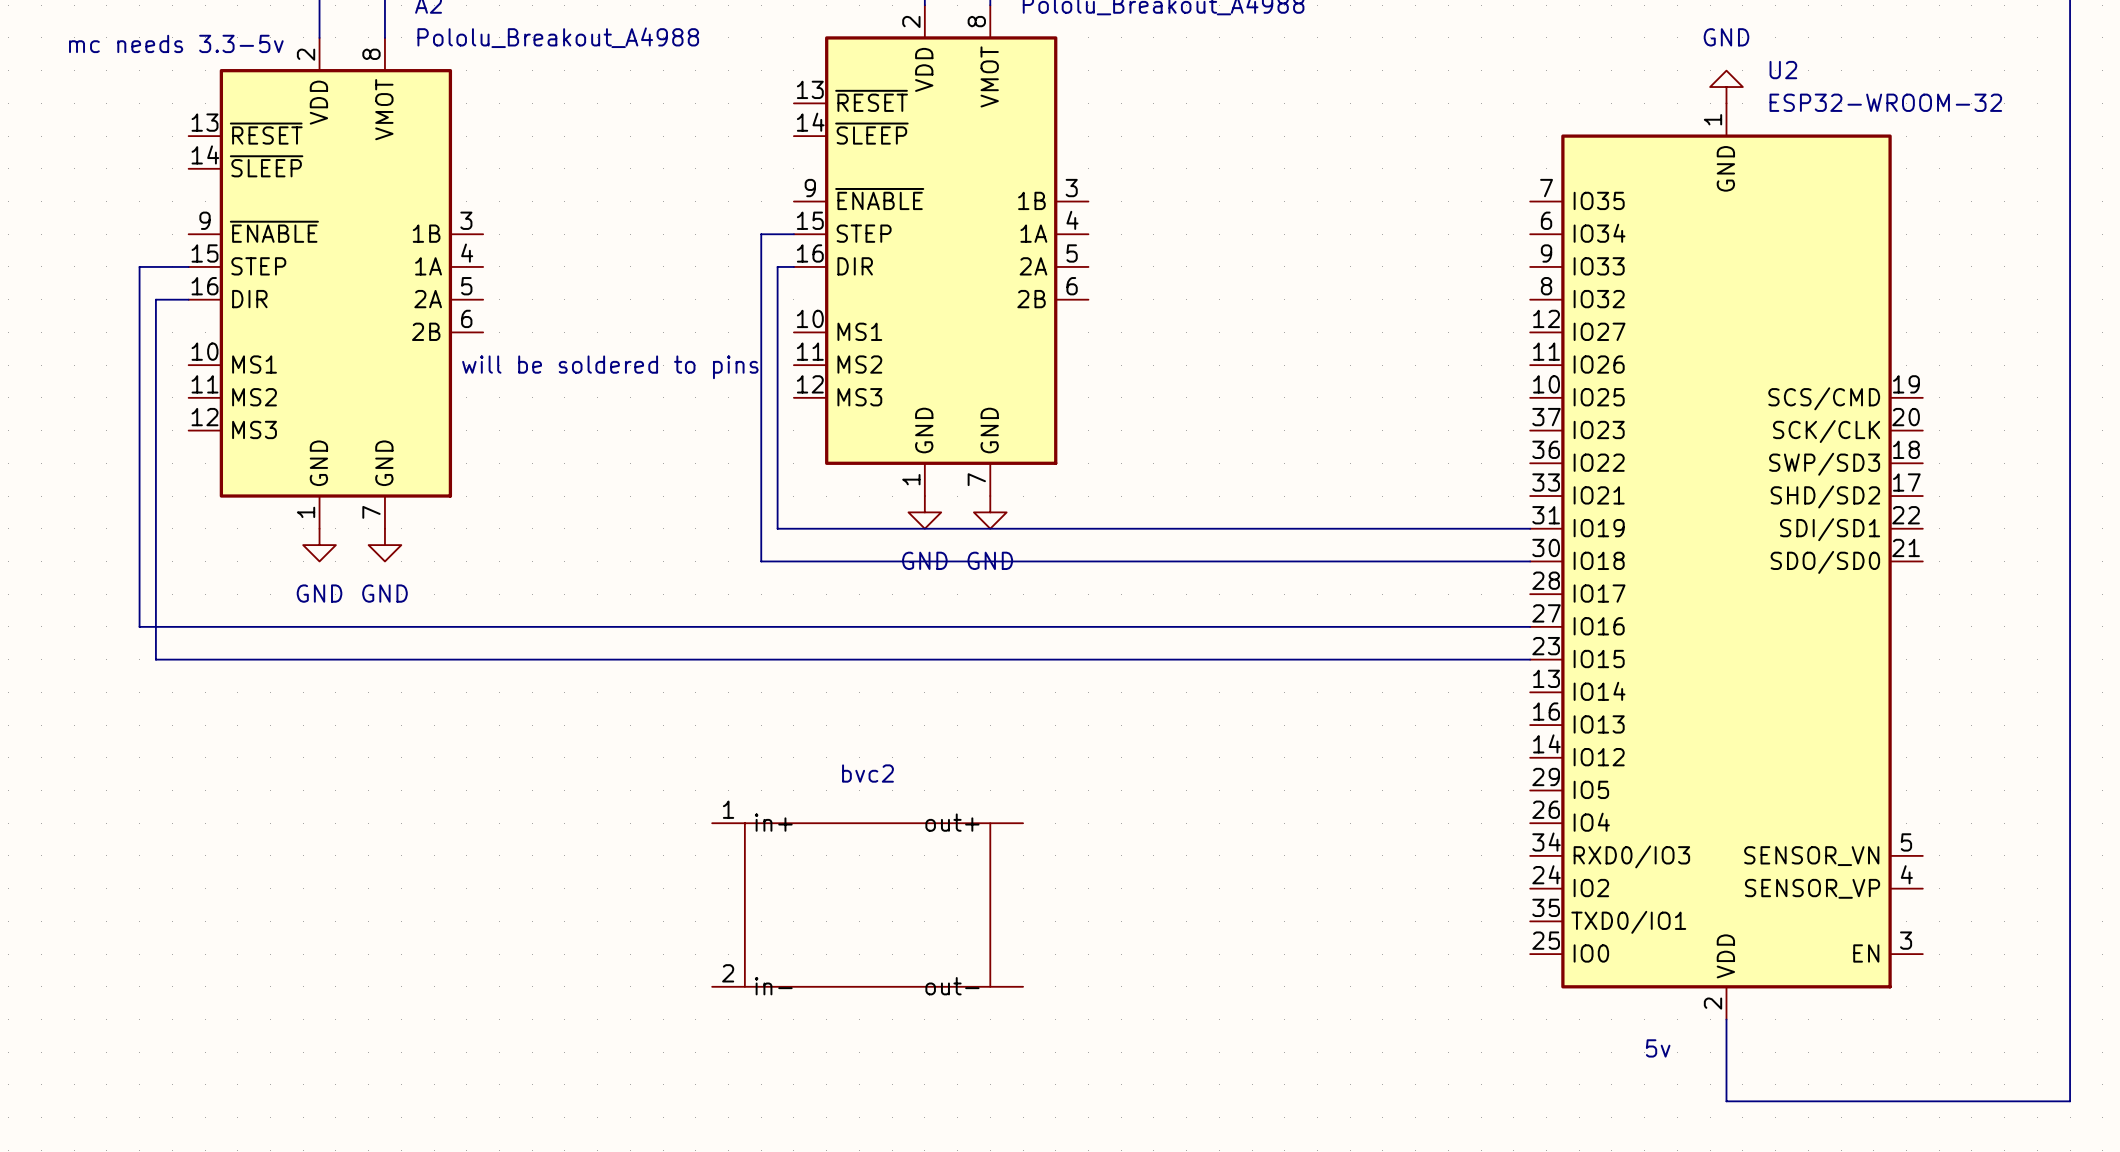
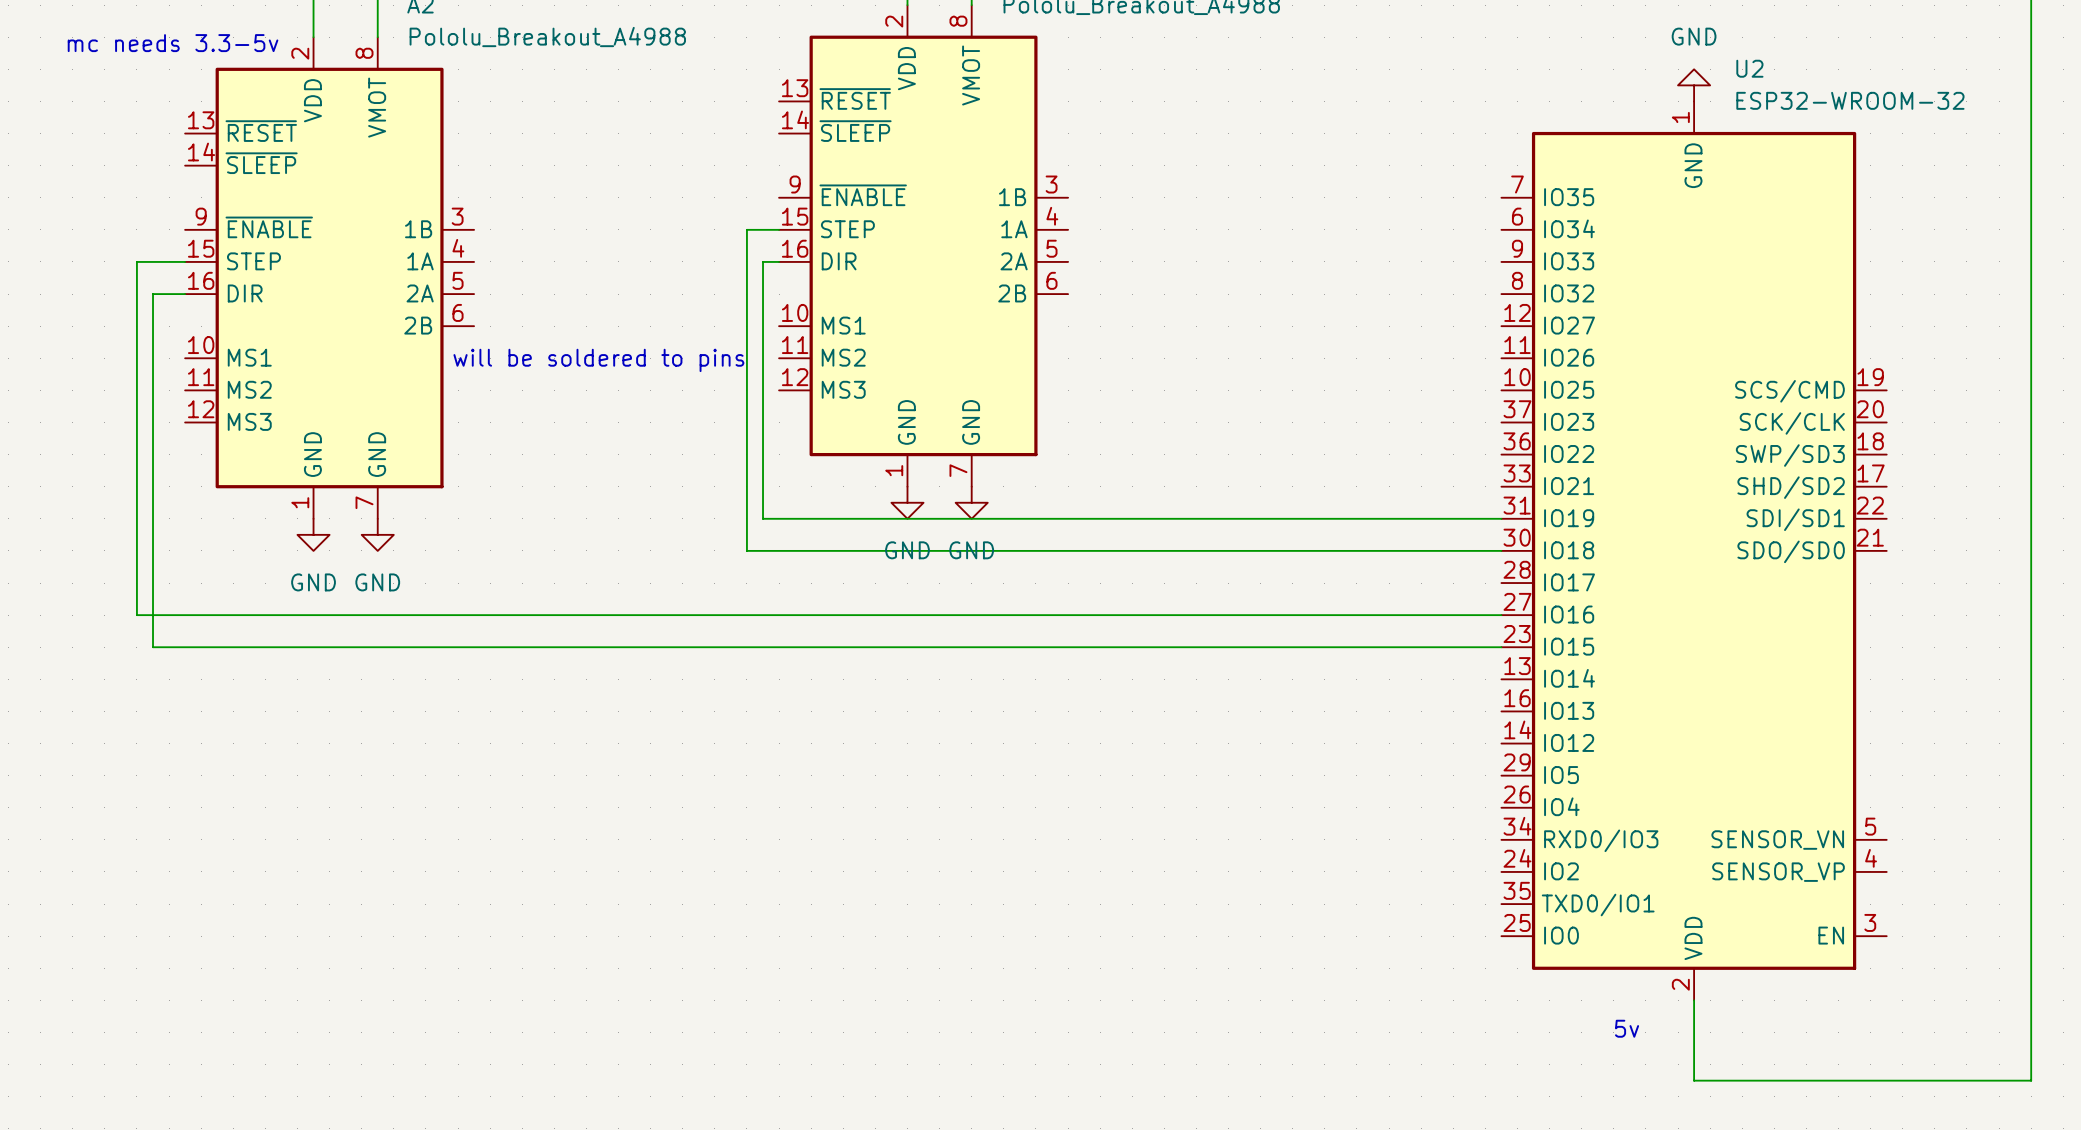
bvc2: (867, 905) -> none

